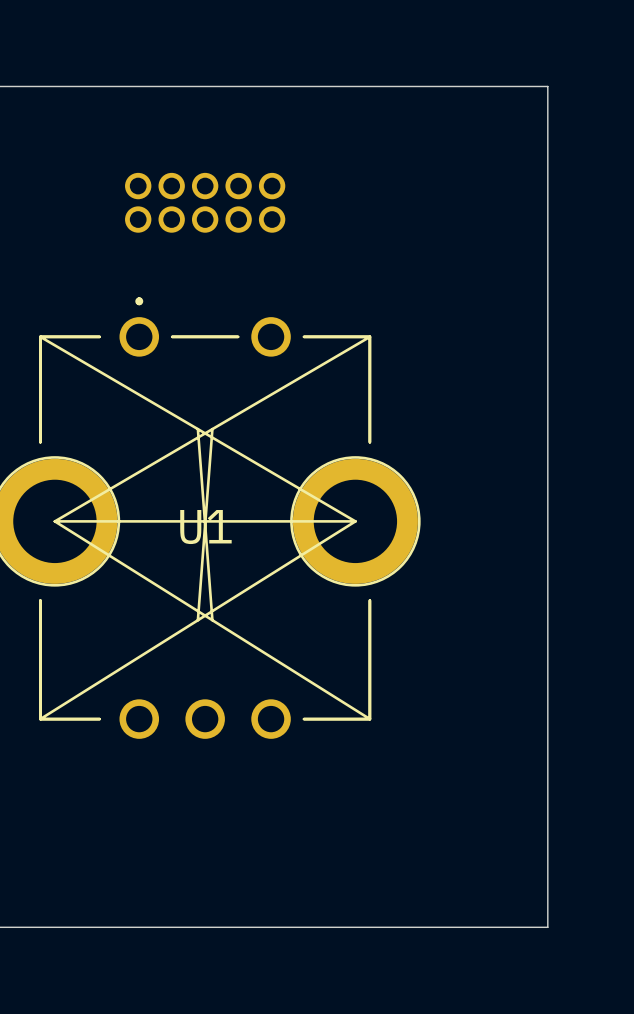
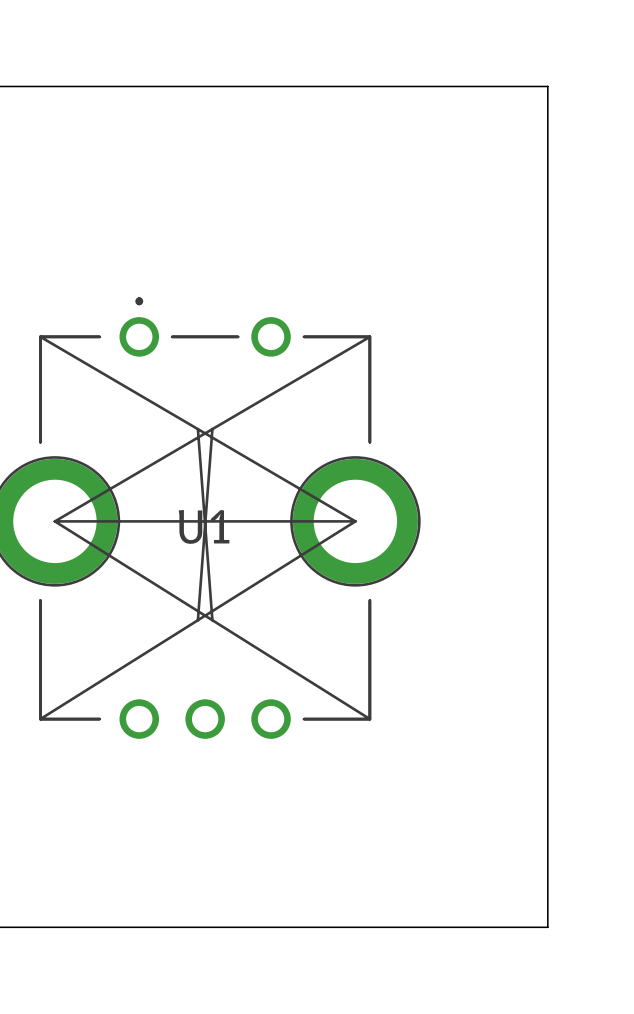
part: (205, 202) -> none

